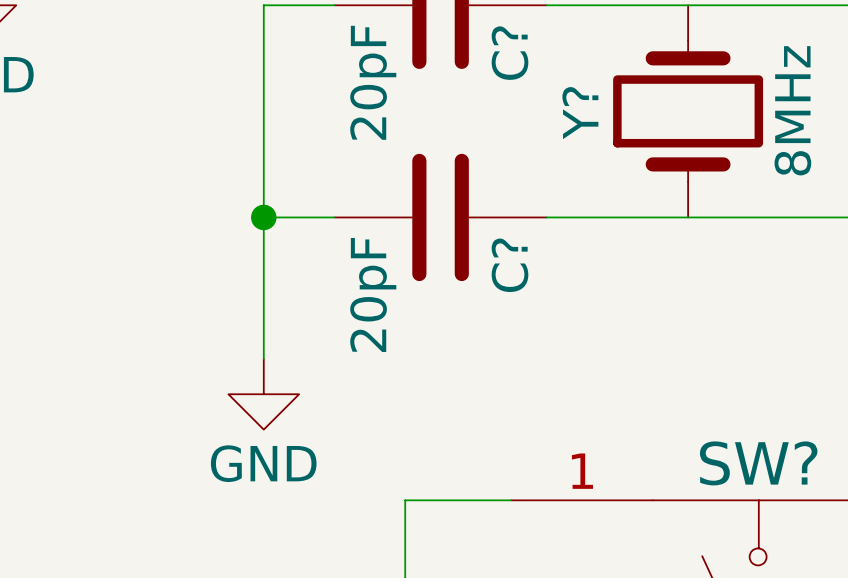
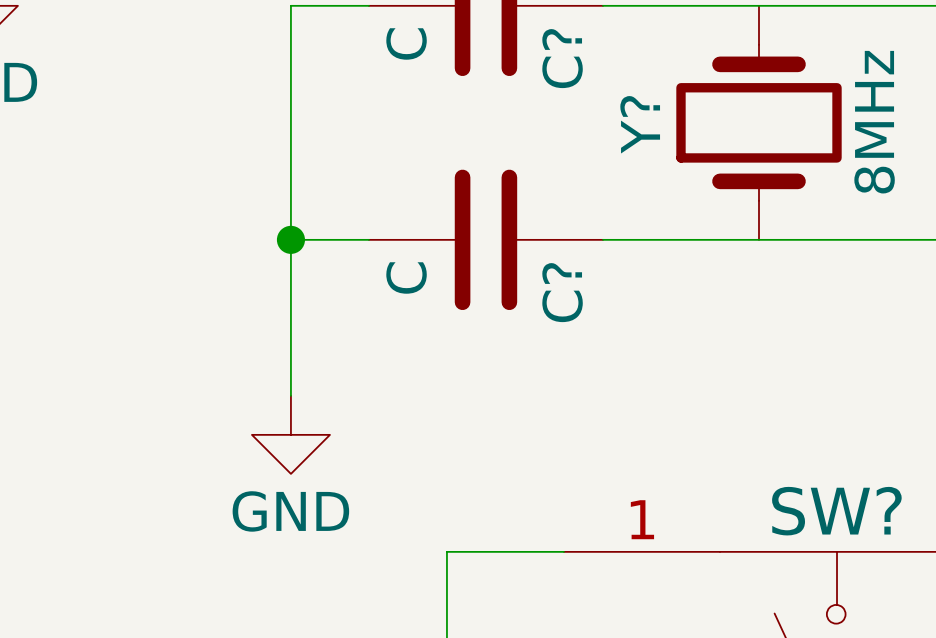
C? value: 20pF (373, 82) -> C (406, 43)
C? value: 20pF (373, 294) -> C (406, 277)

